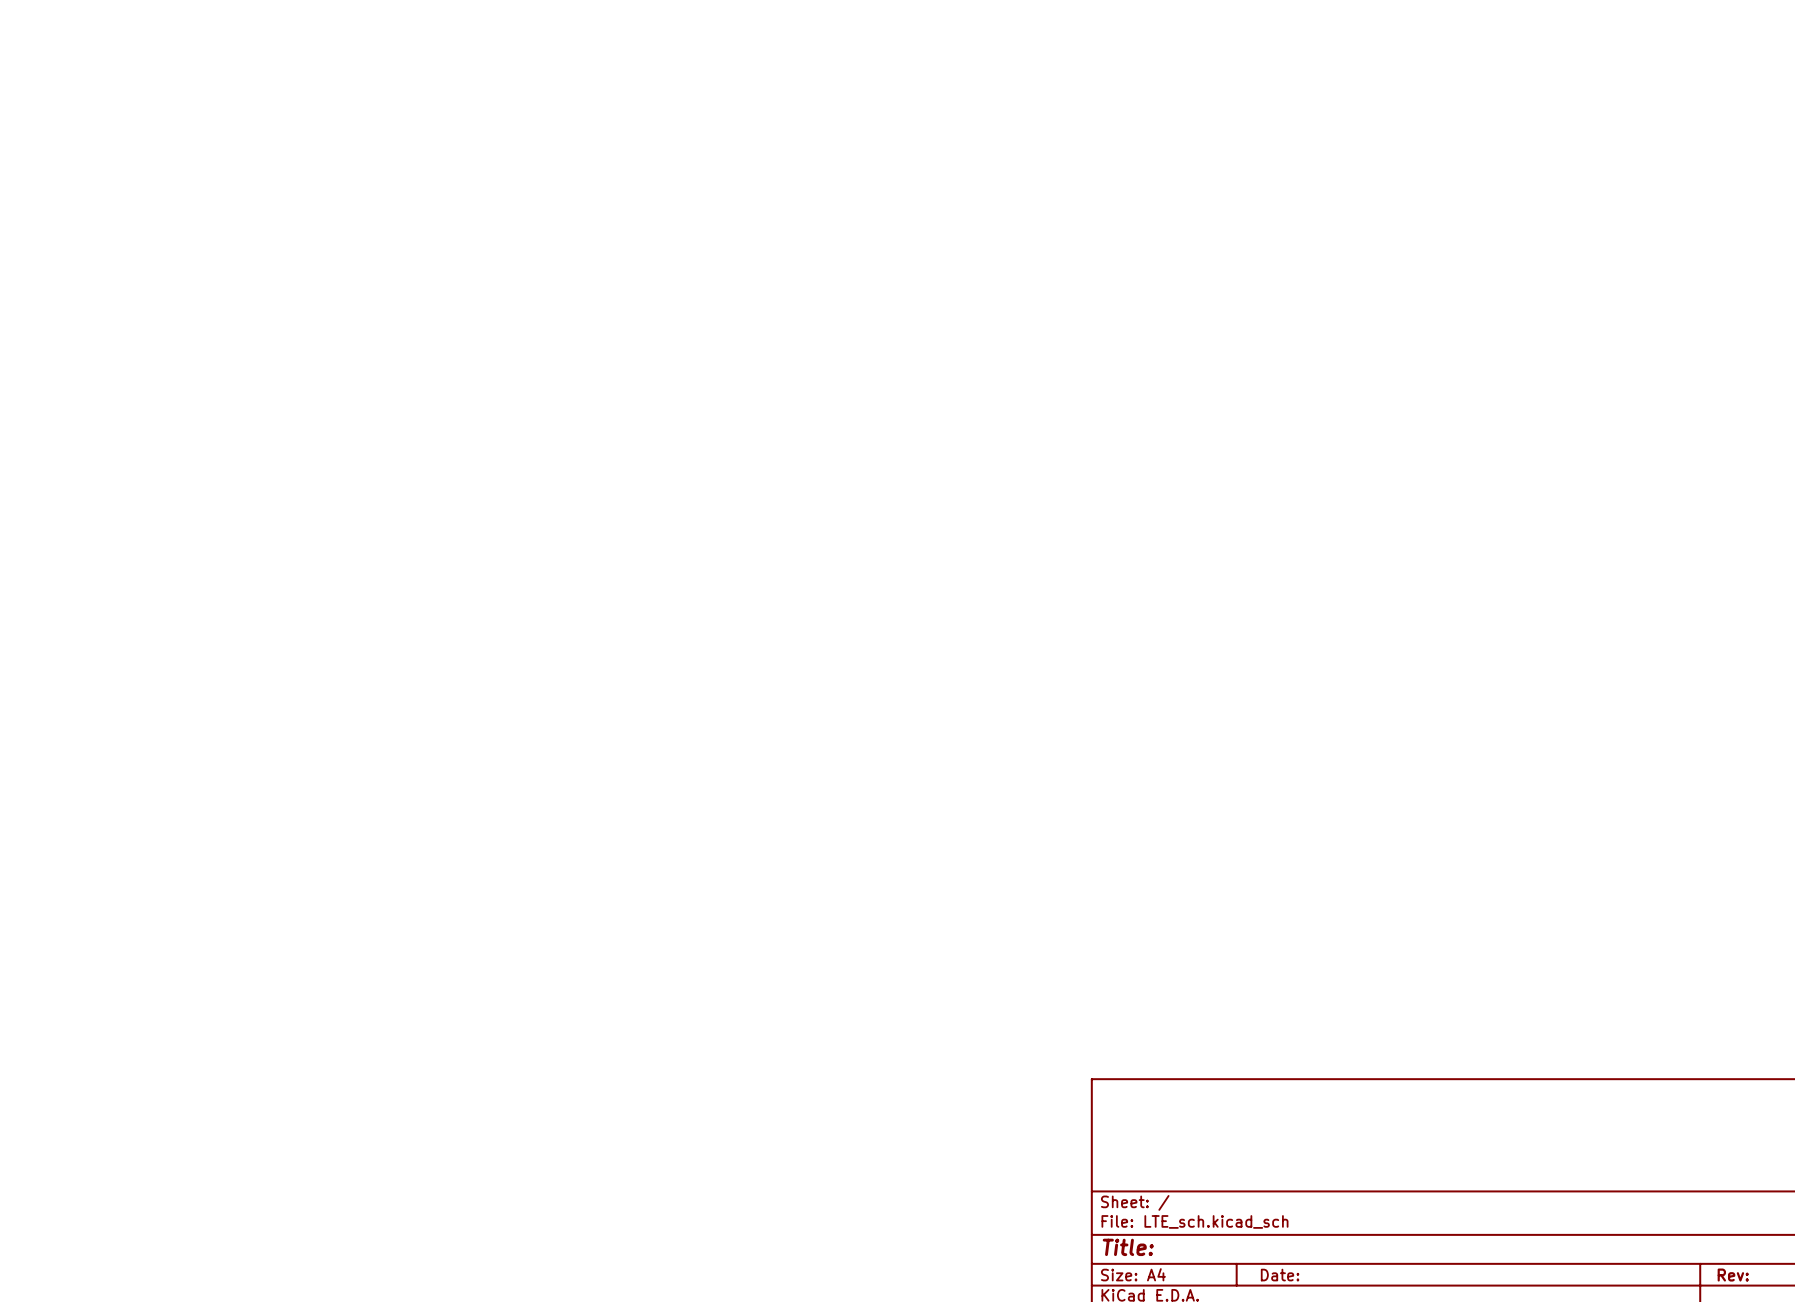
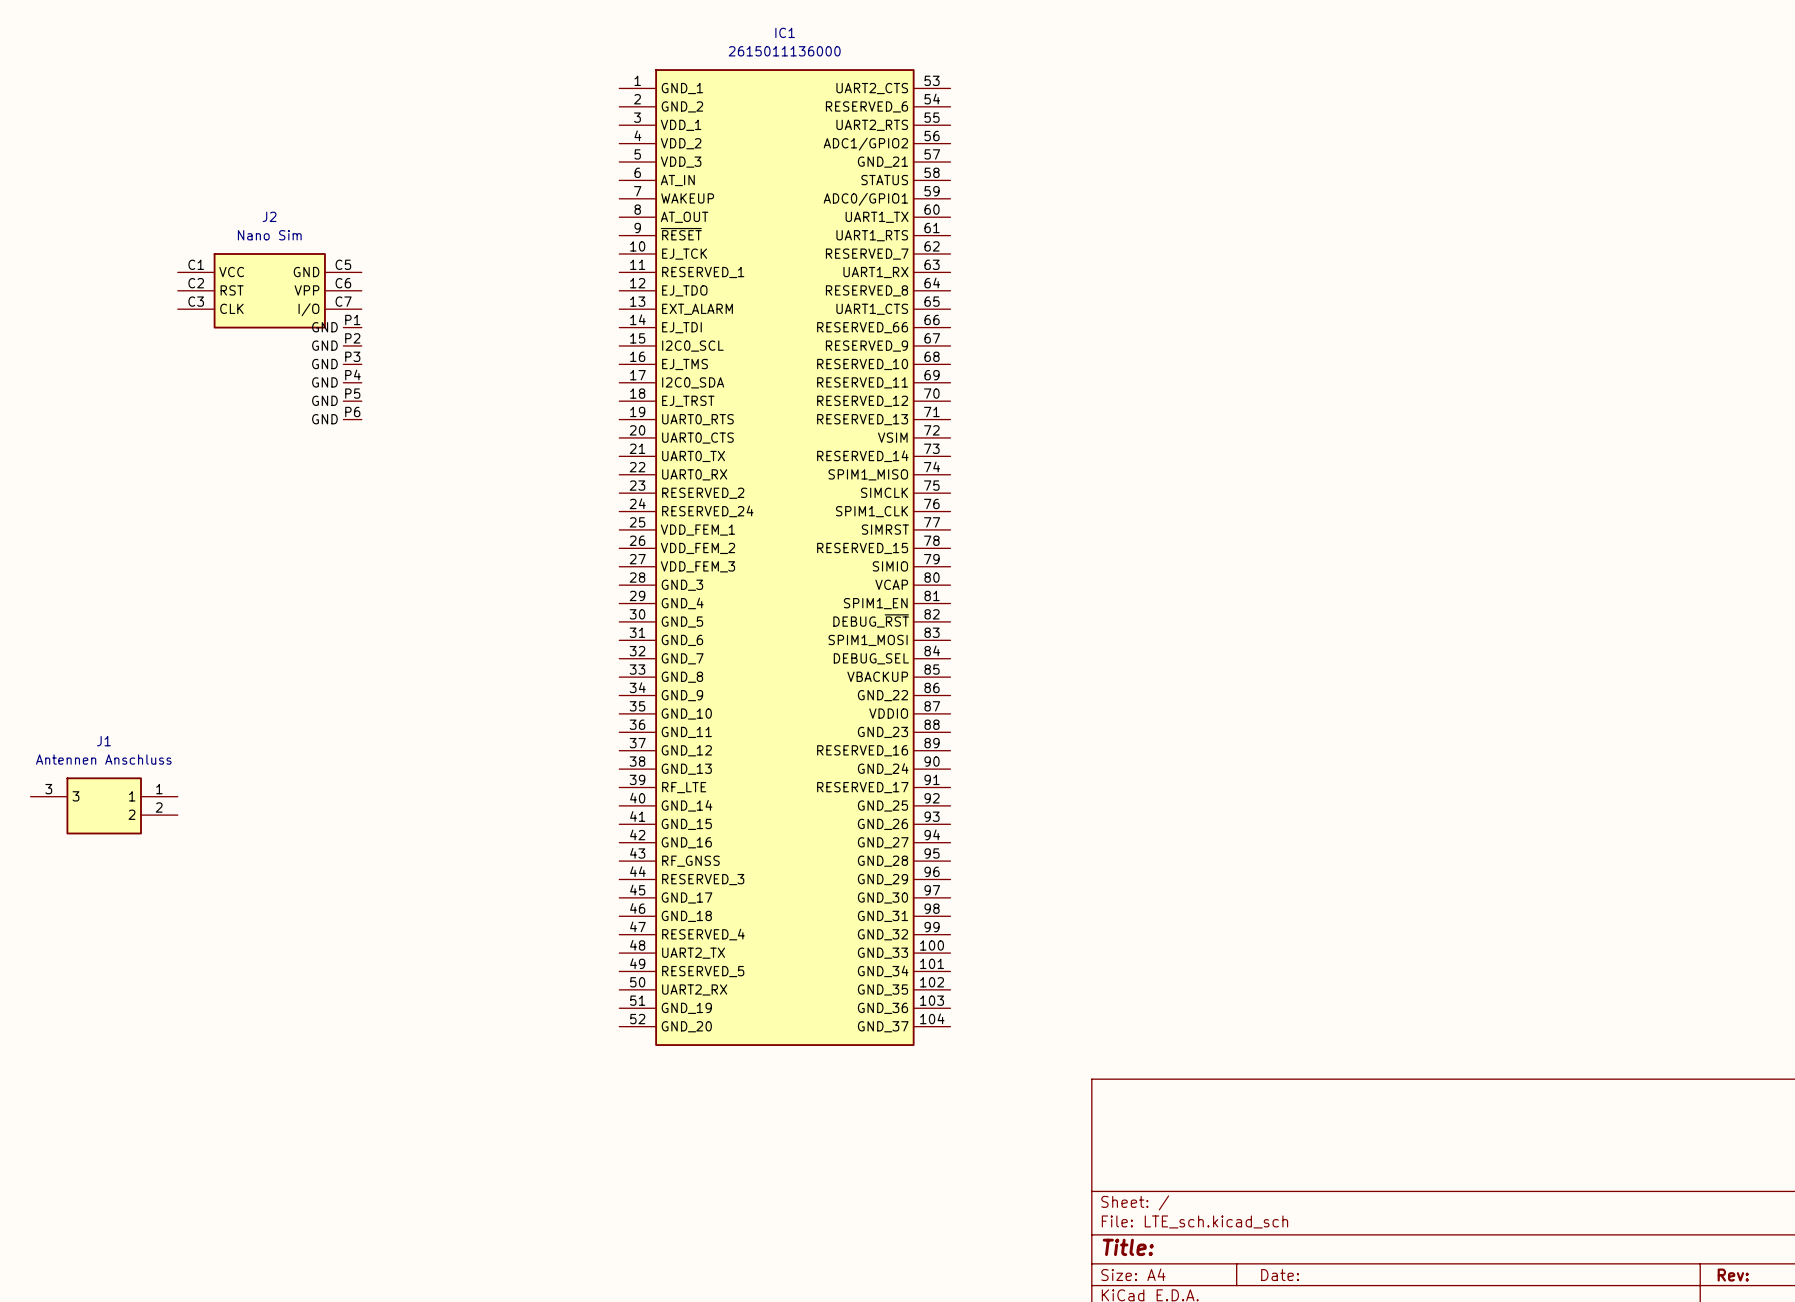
J2: none -> Nano Sim (269, 336)
IC1: none -> 2615011136000 (784, 557)
J1: none -> Antennen Anschluss (104, 805)

